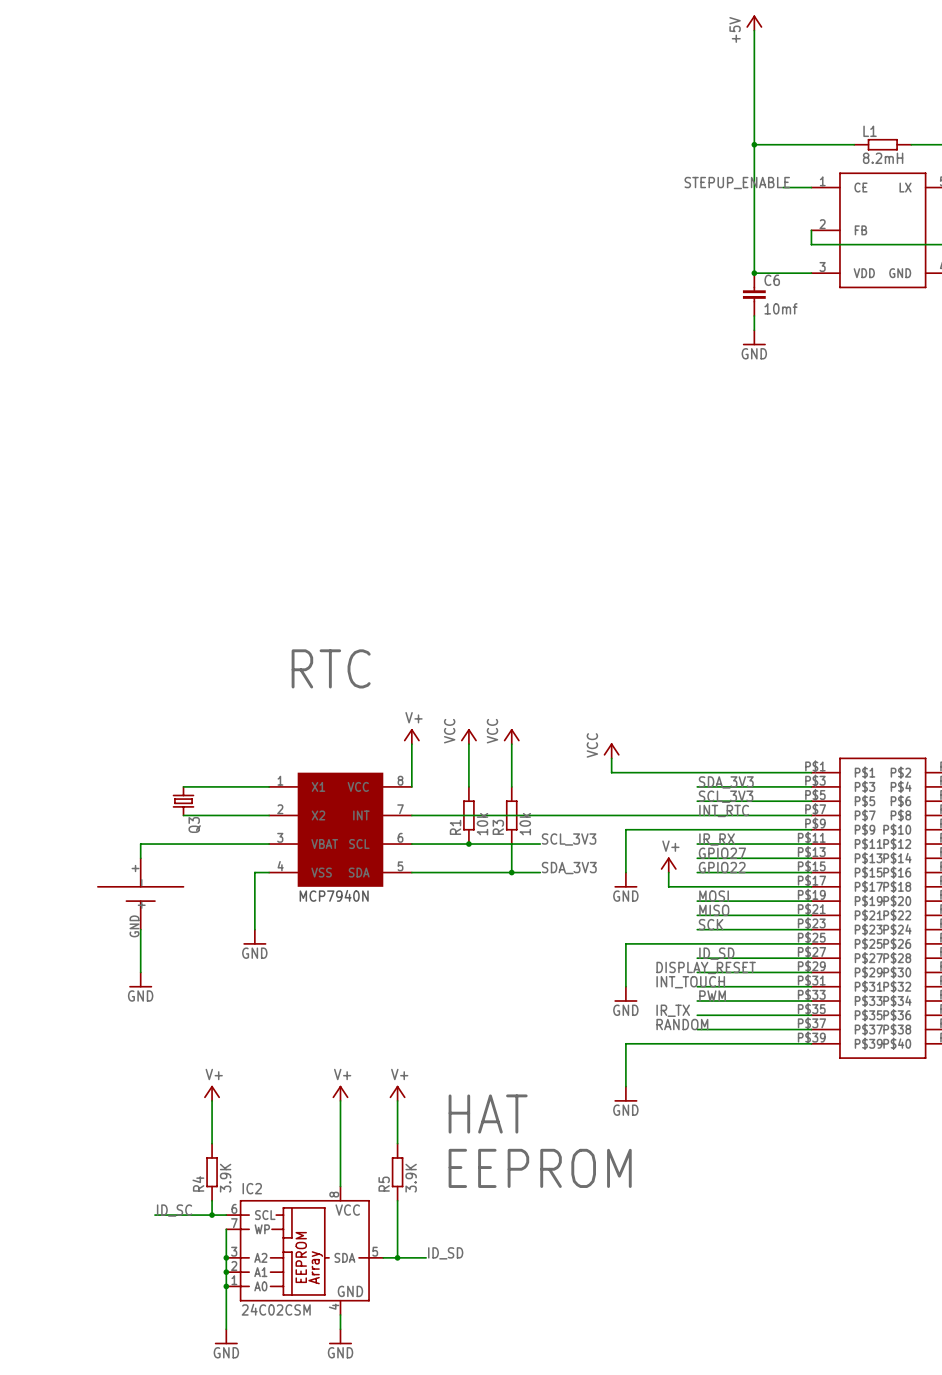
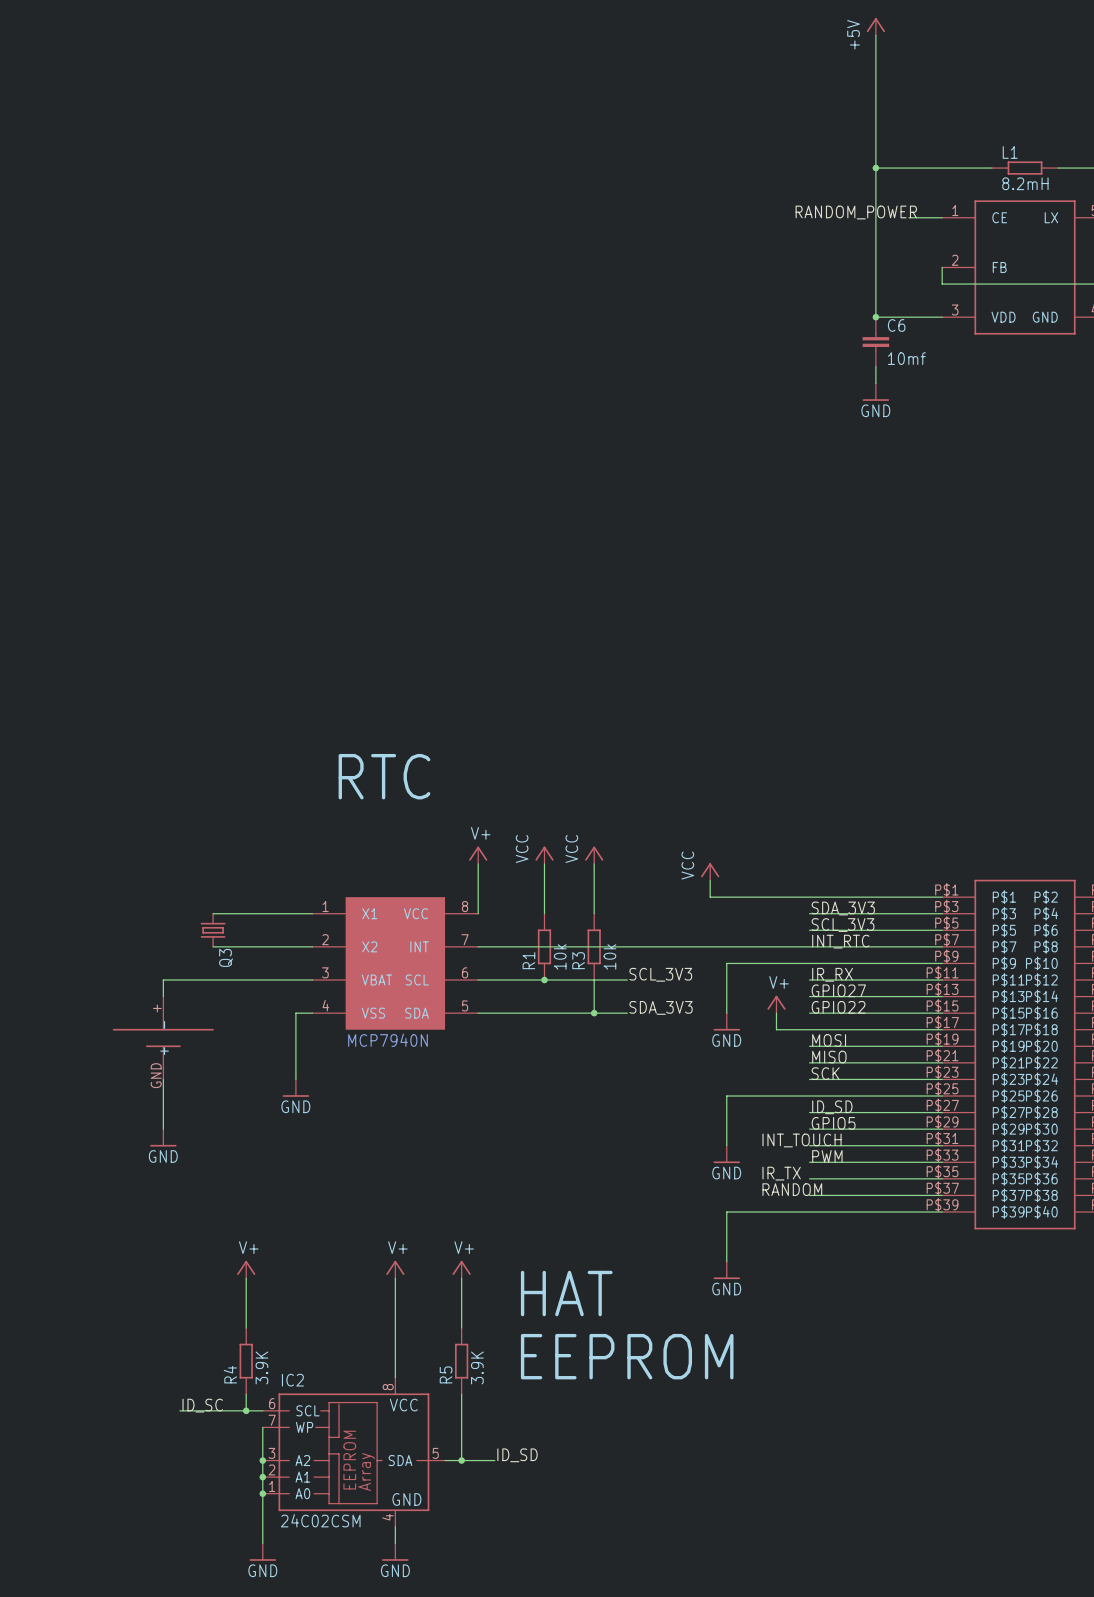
label: STEPUP_ENABLE (737, 183) -> RANDOM_POWER (856, 212)
label: DISPLAY_RESET (706, 967) -> none
label: none -> GPIO5 (833, 1123)

